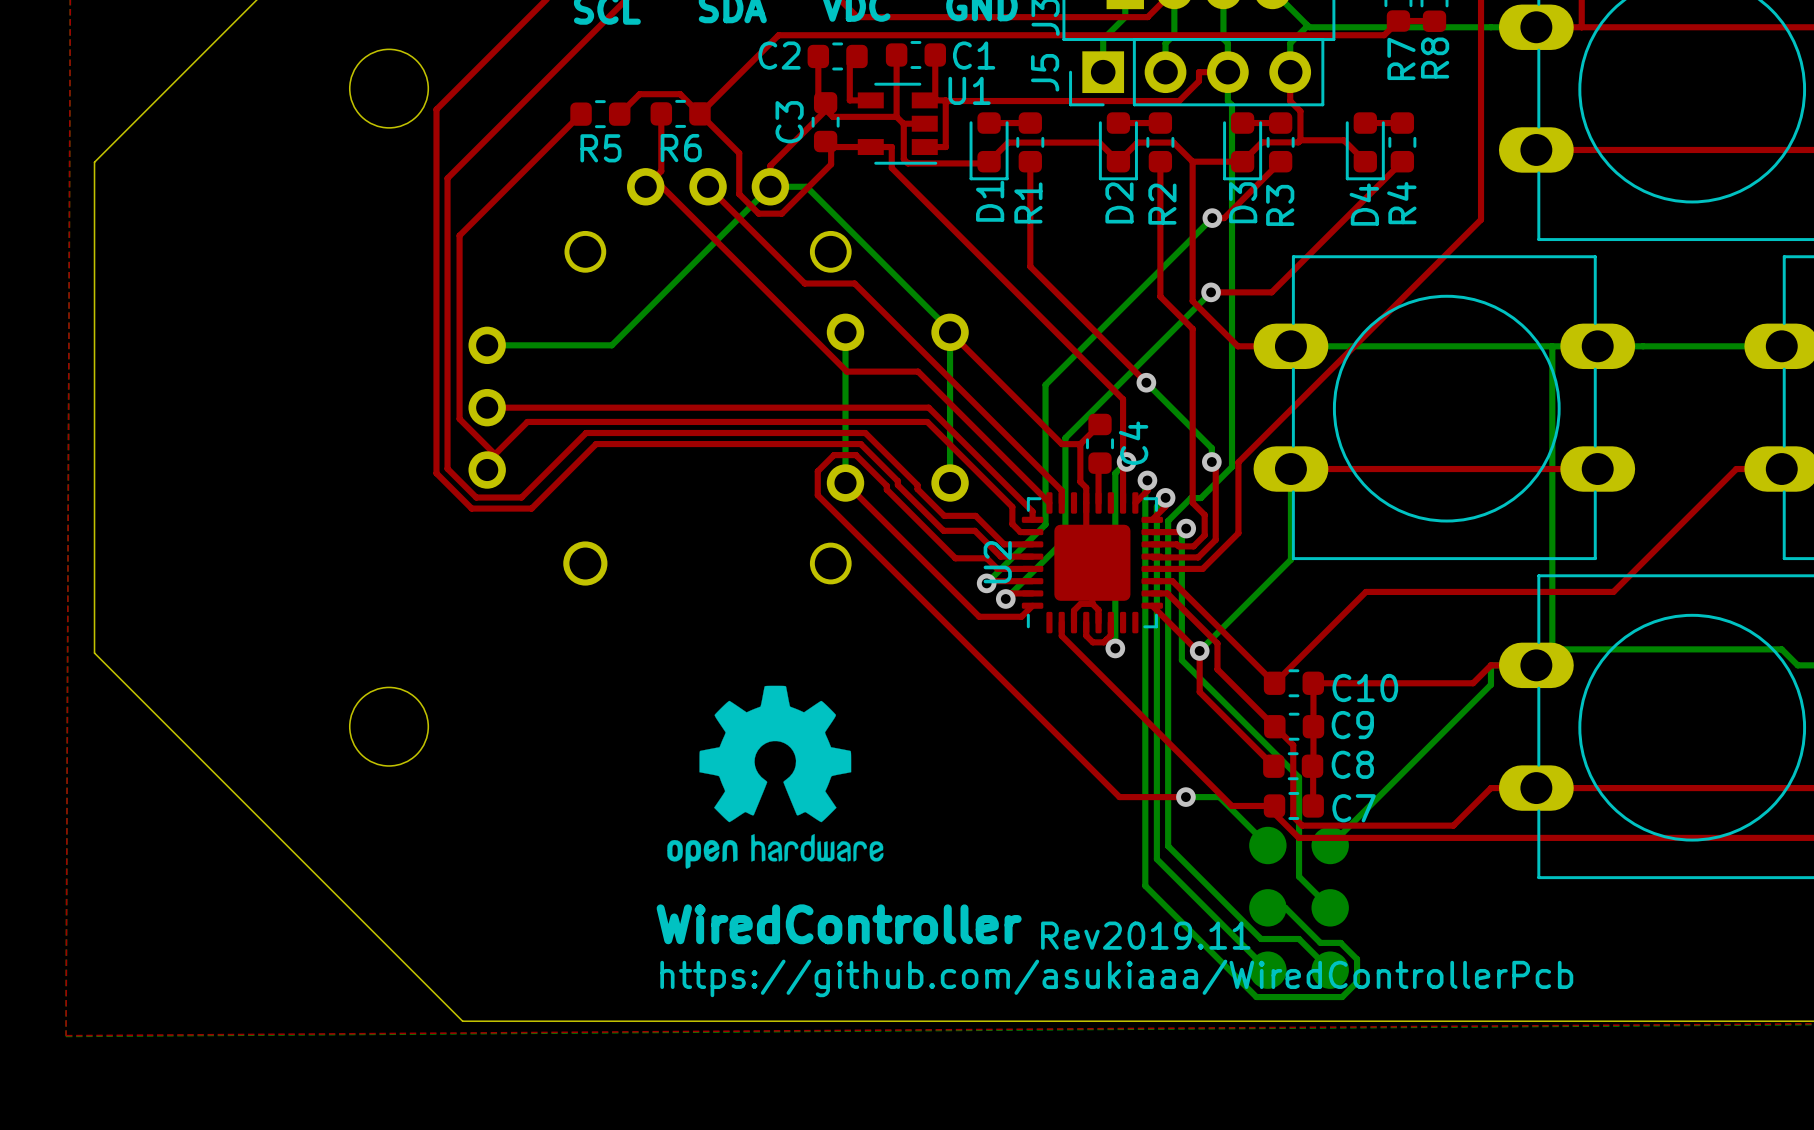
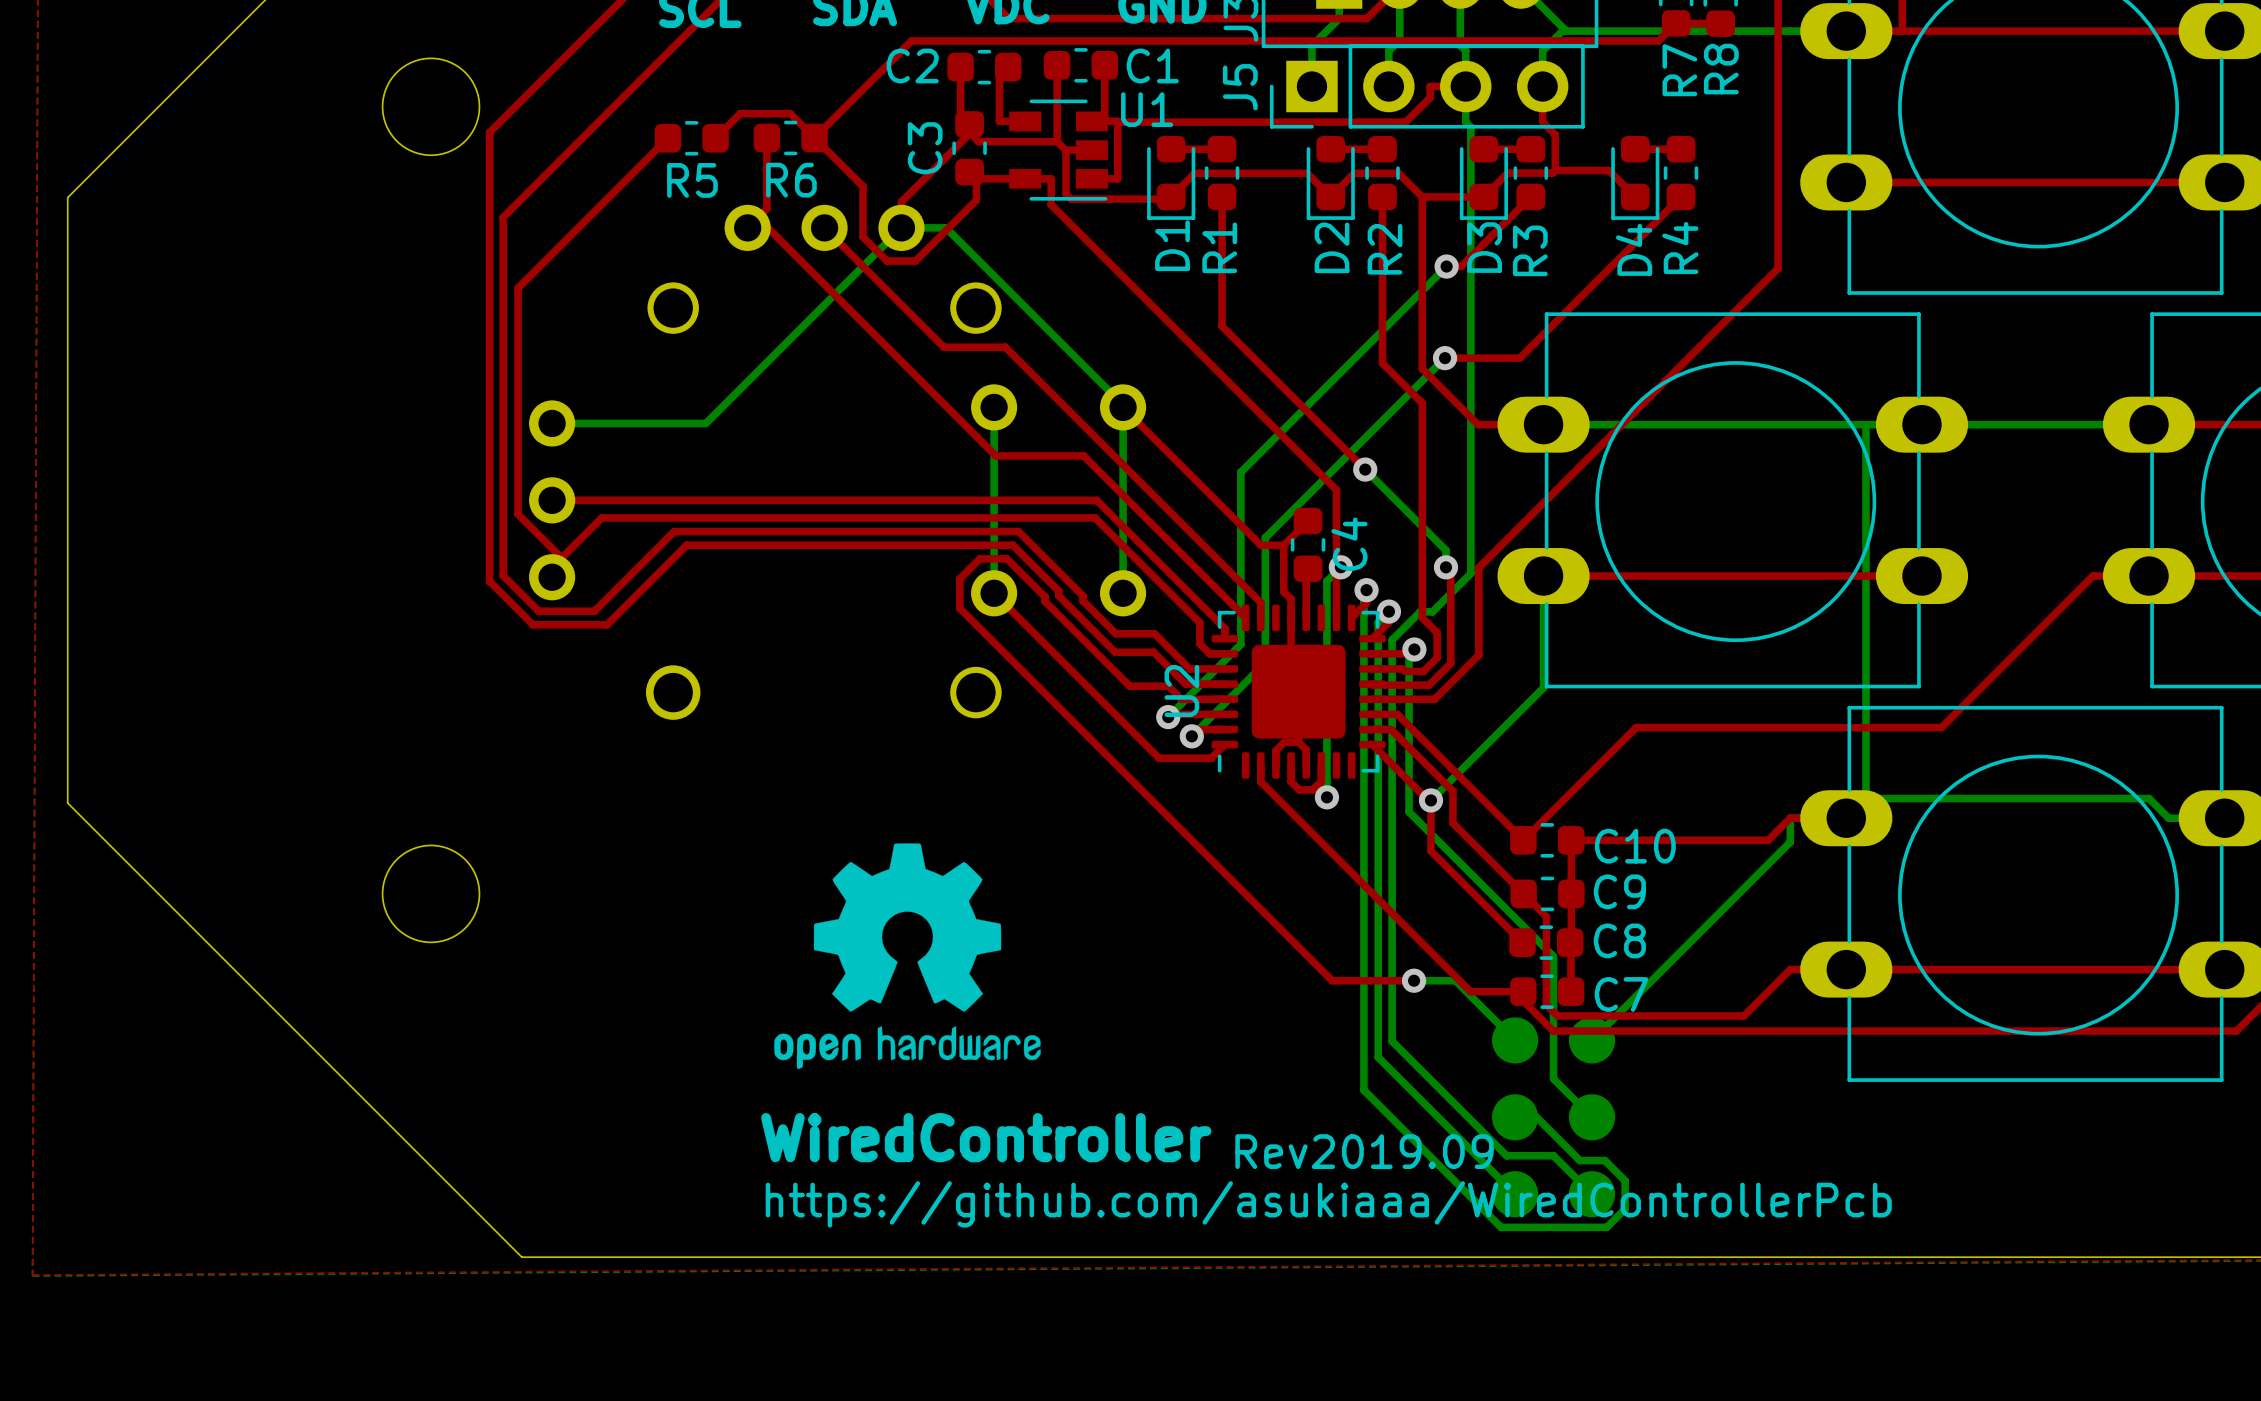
text: Rev2019.11 (1145, 935) -> Rev2019.09 (1364, 1151)

